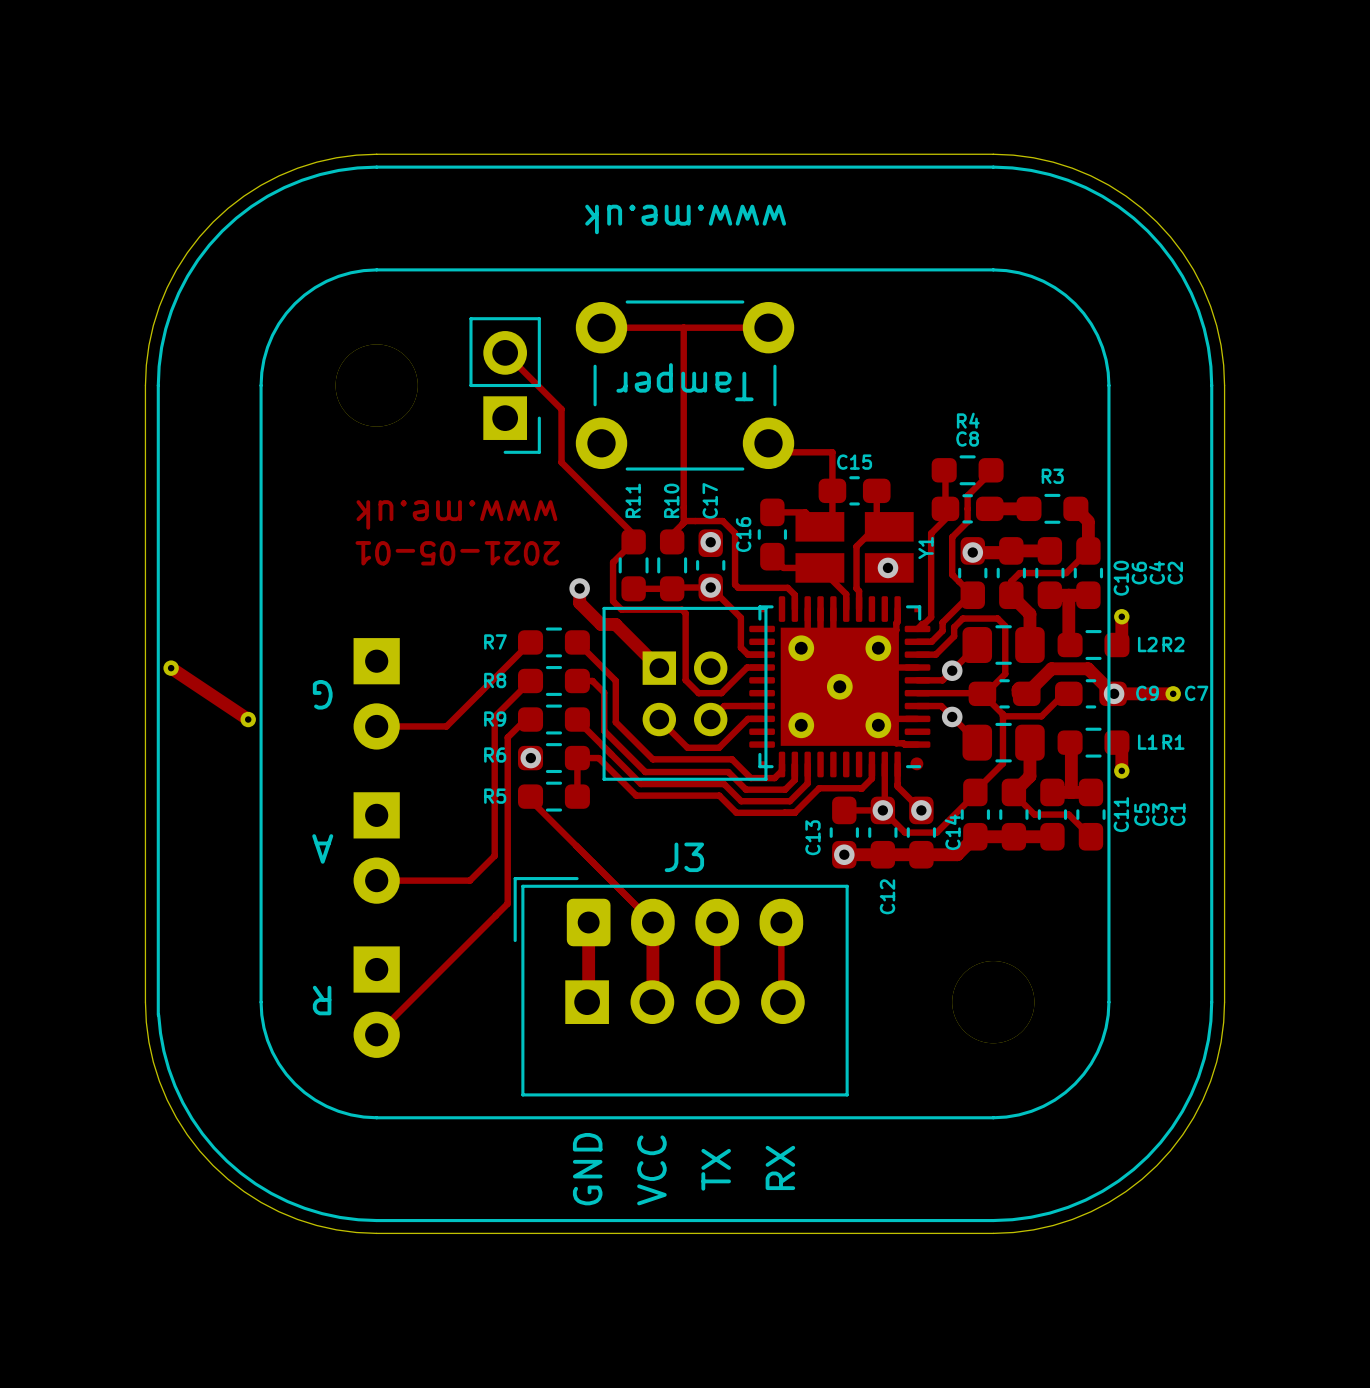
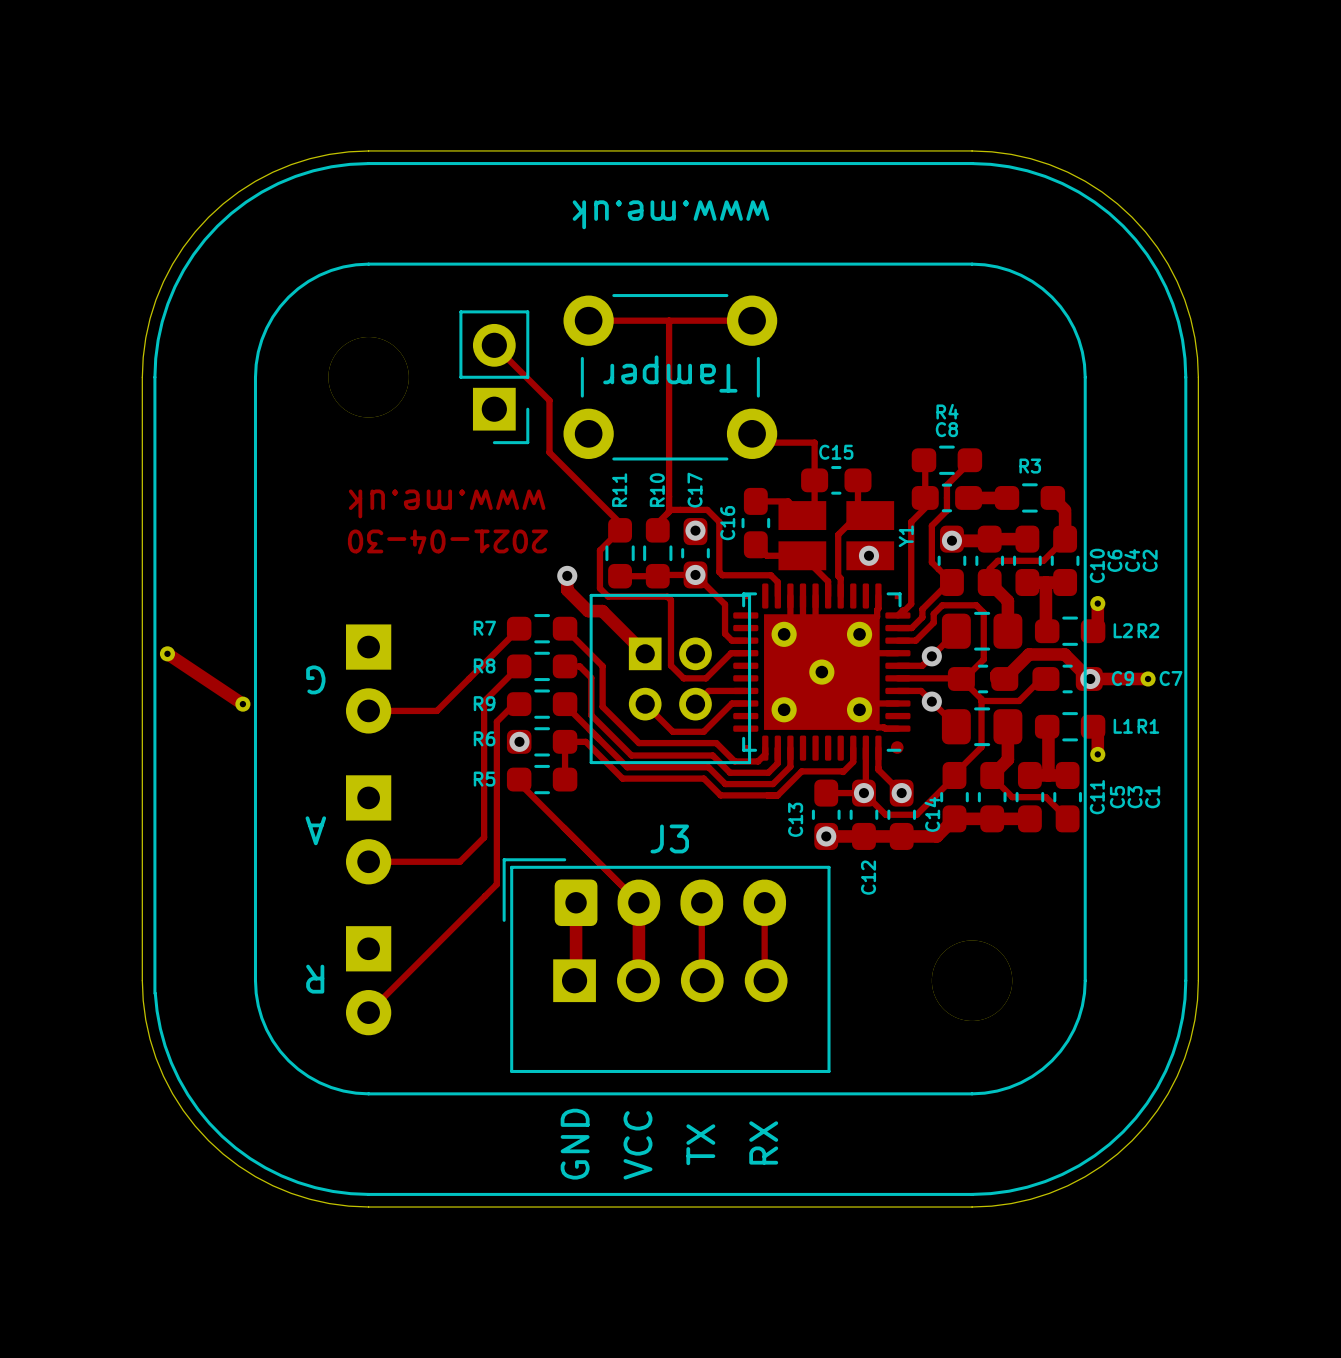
text: 2021-05-01 (457, 553) -> 2021-04-30 (447, 541)

